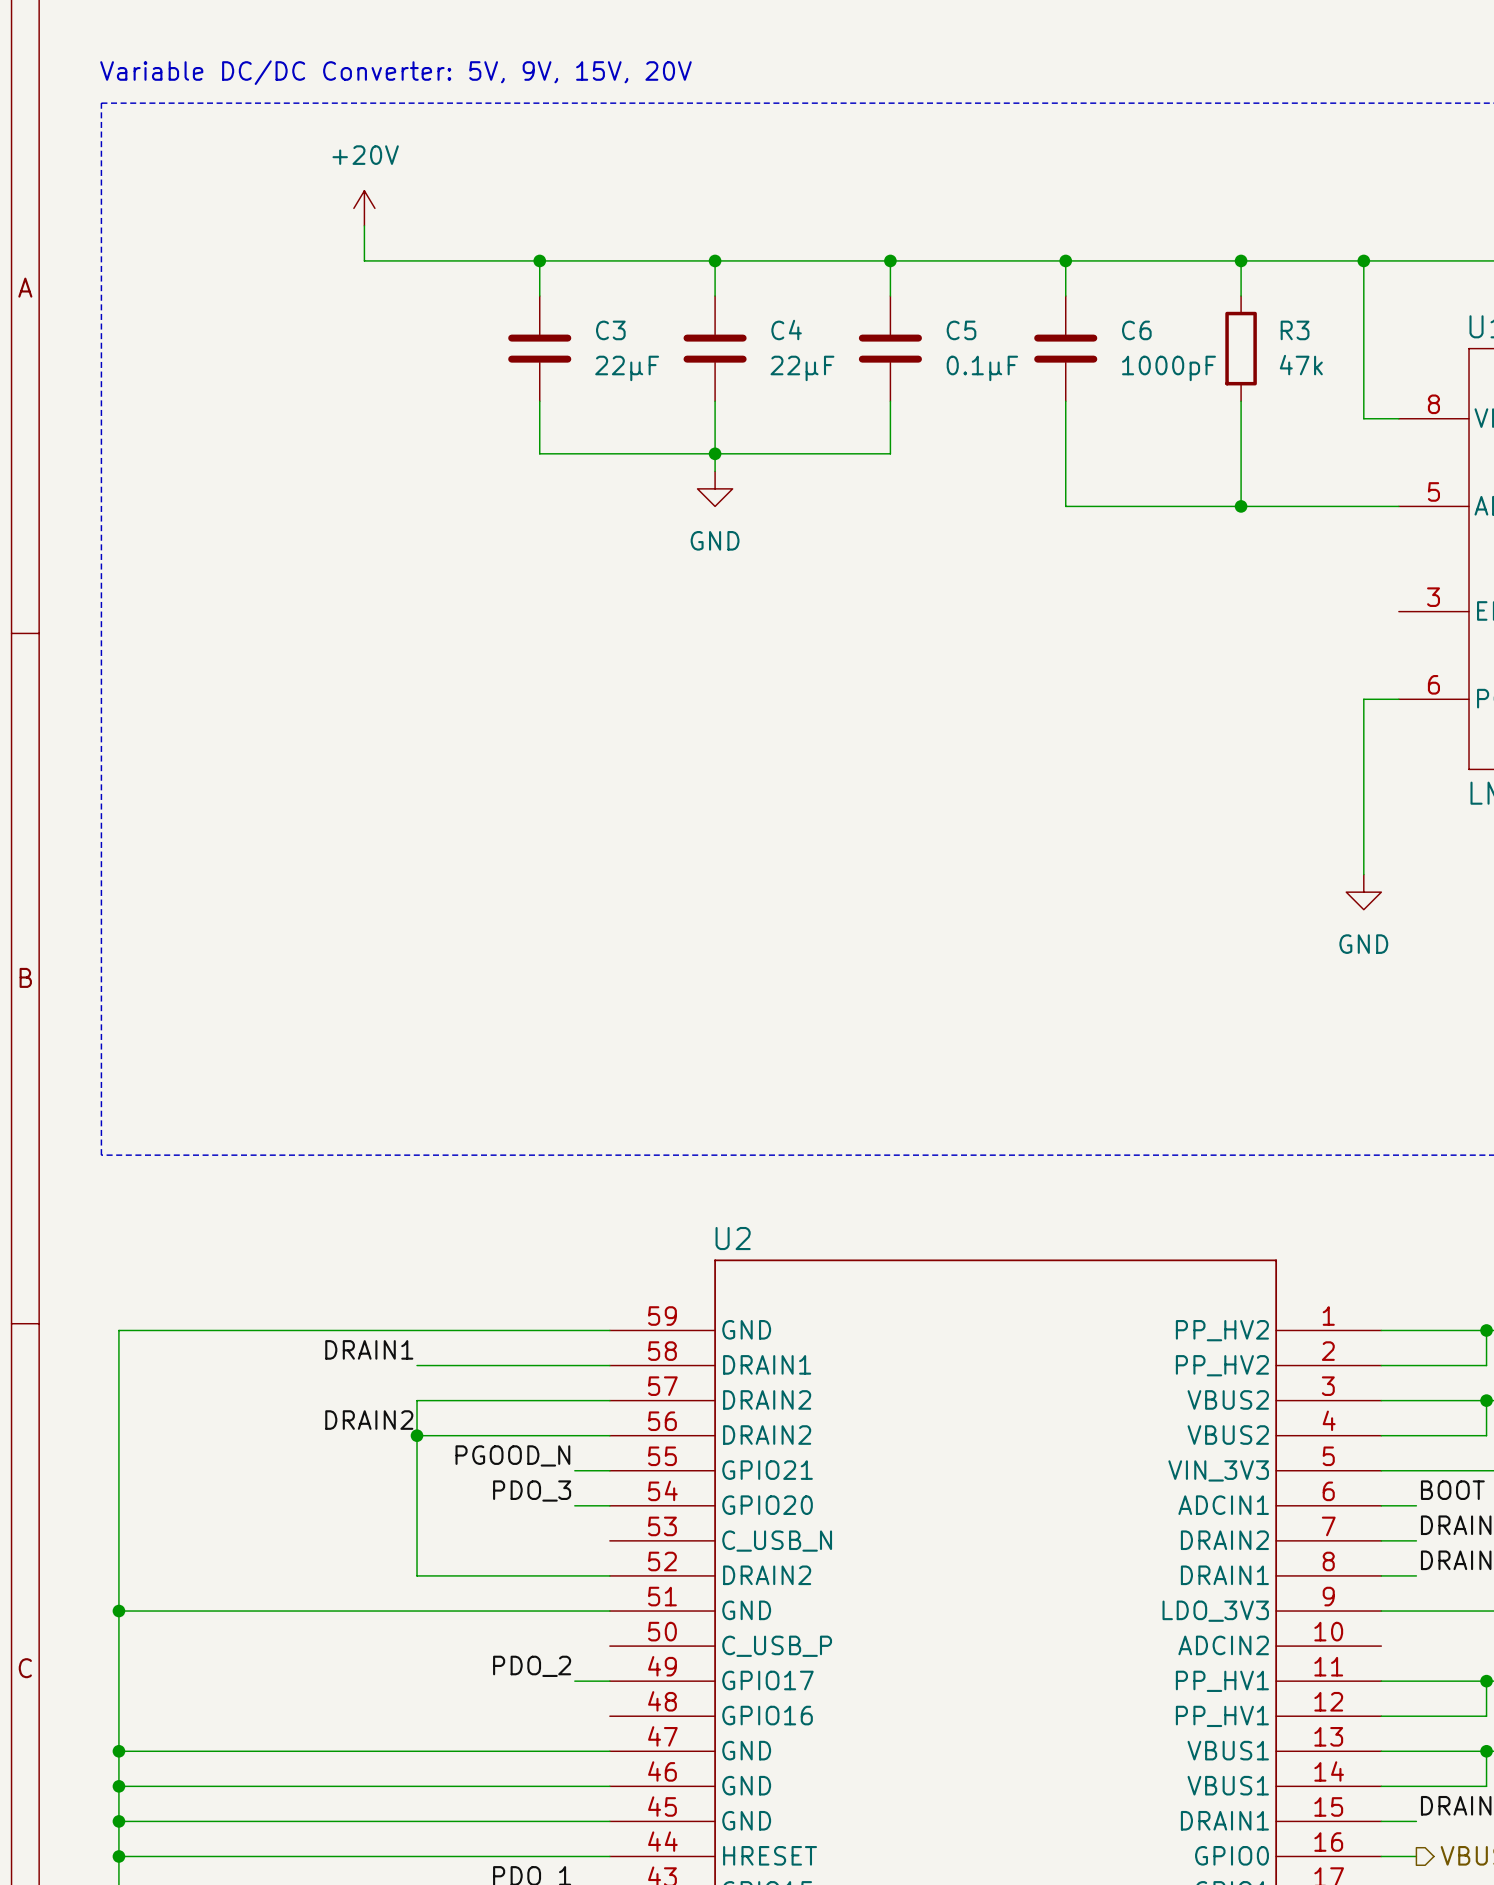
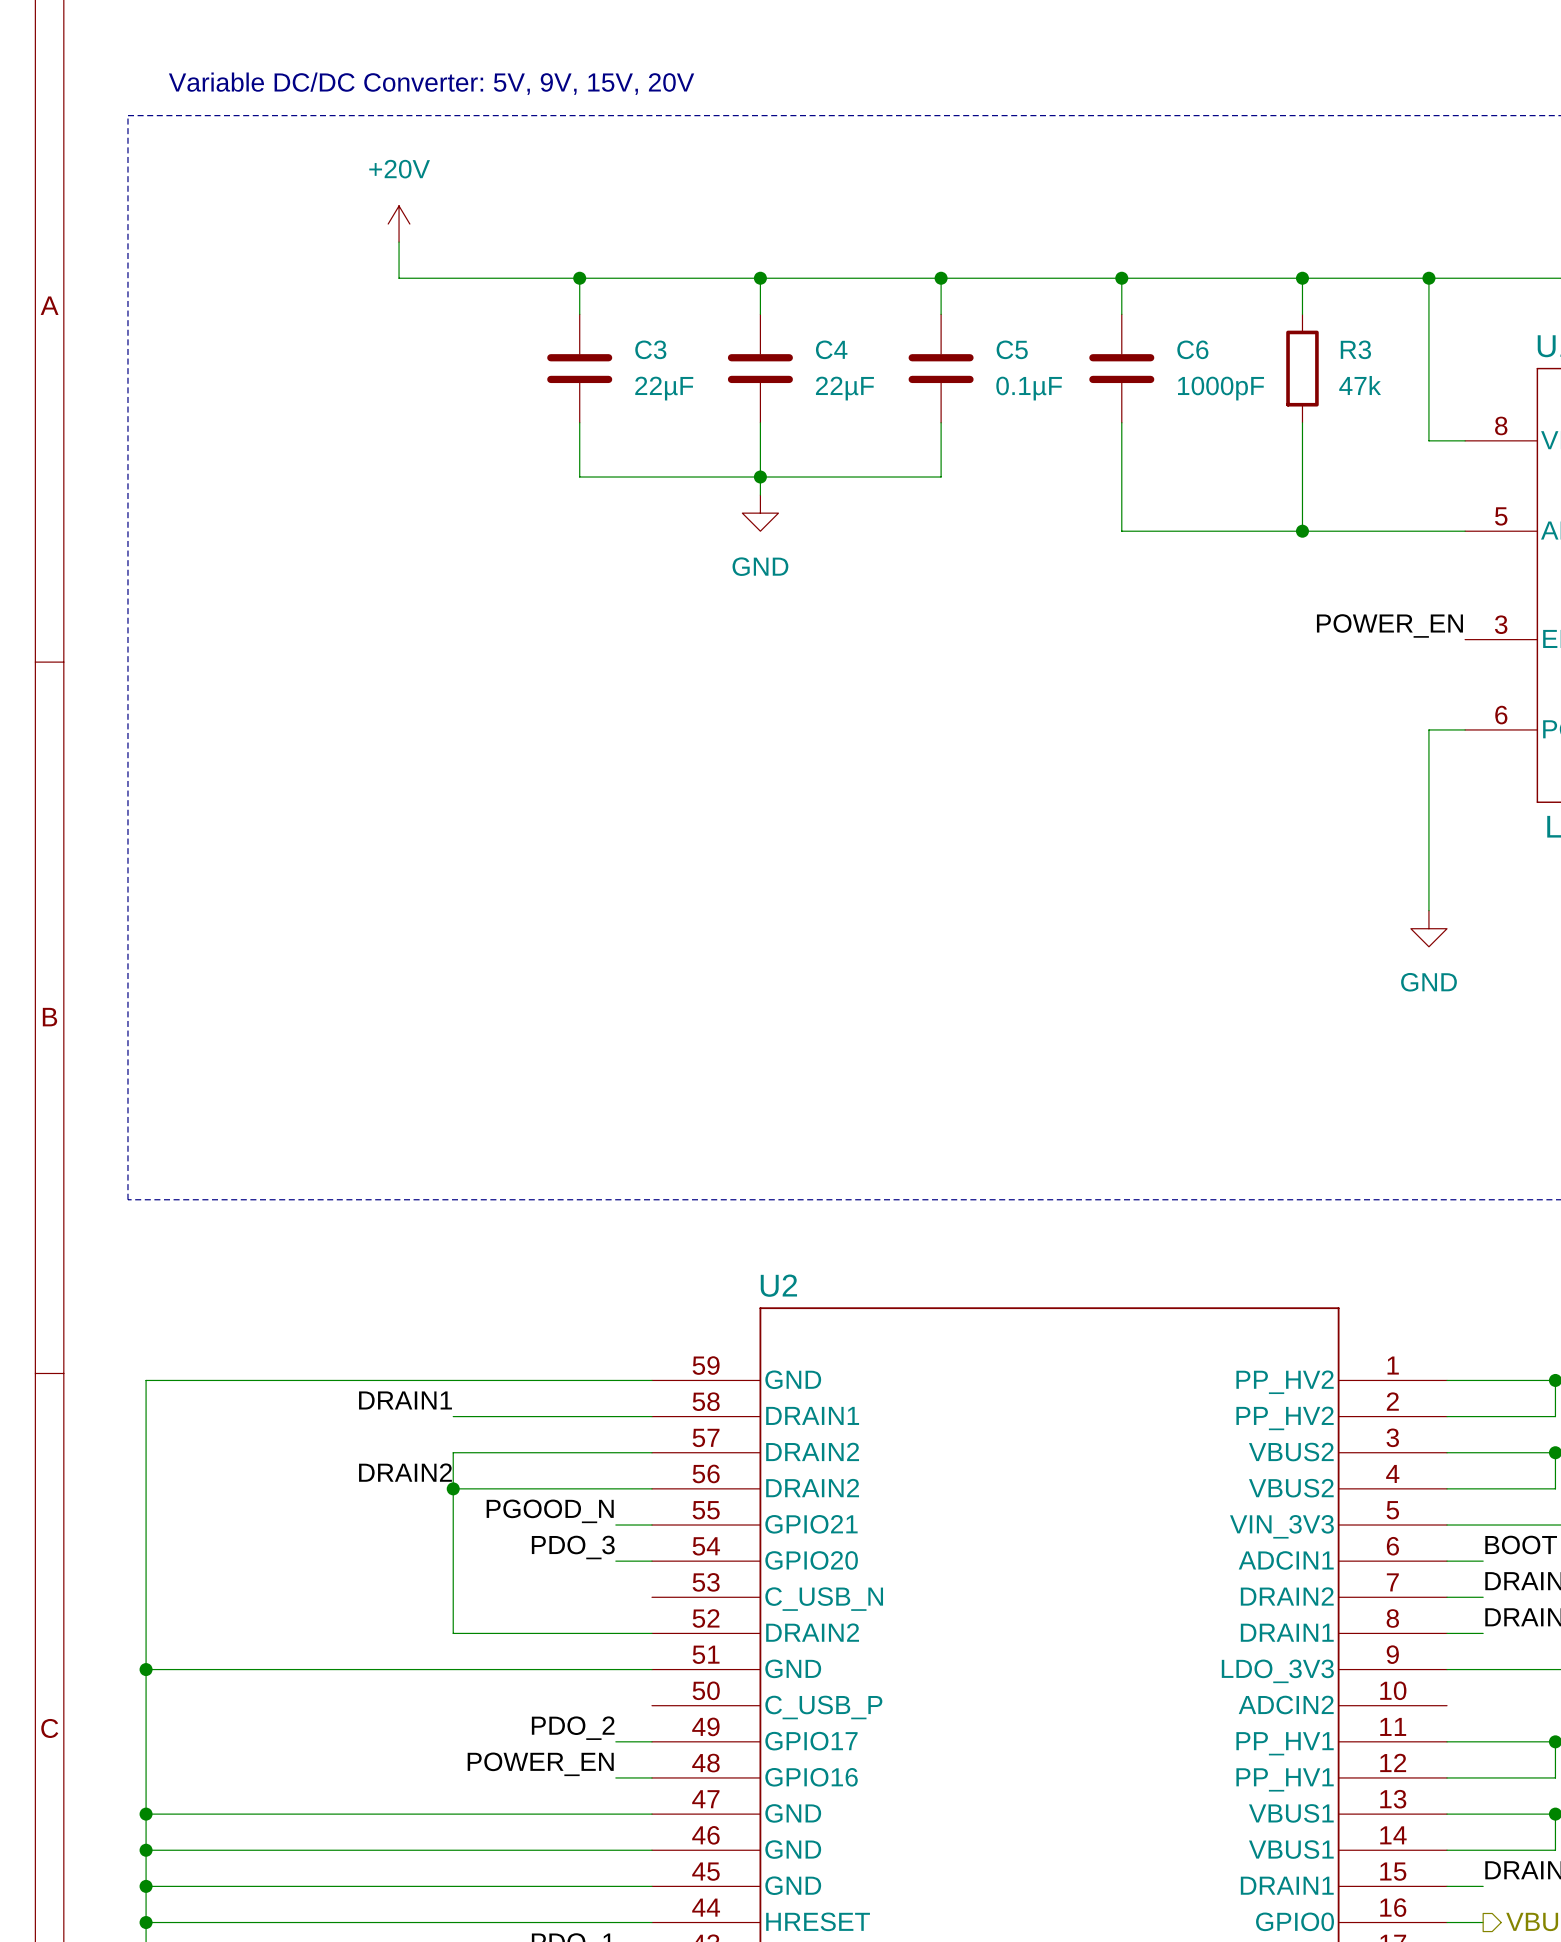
label: none -> POWER_EN (1389, 625)
label: none -> POWER_EN (540, 1764)
wire: none -> (615, 1777) (651, 1777)

